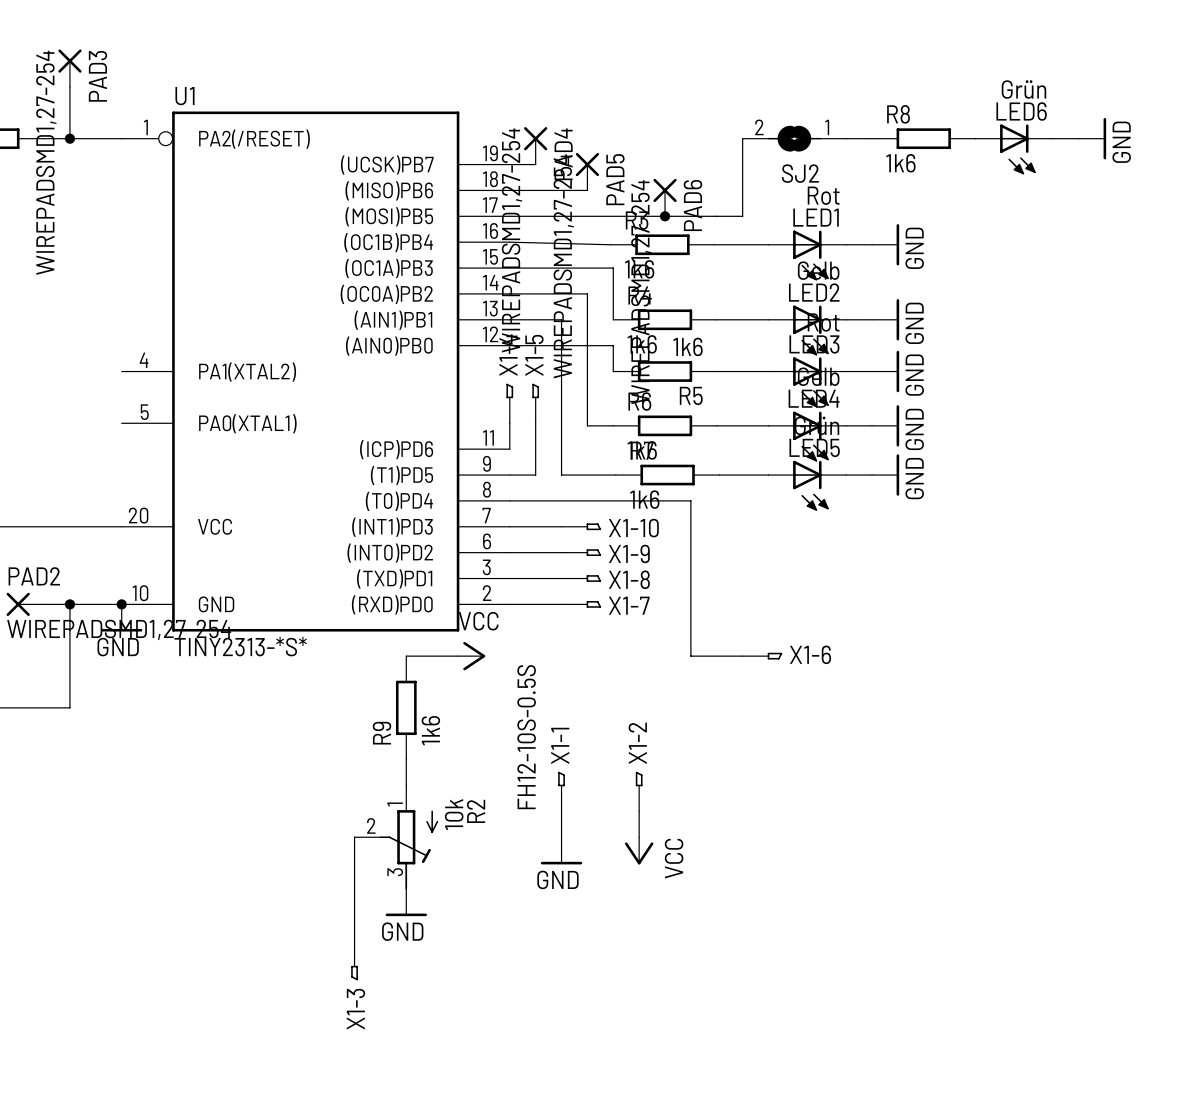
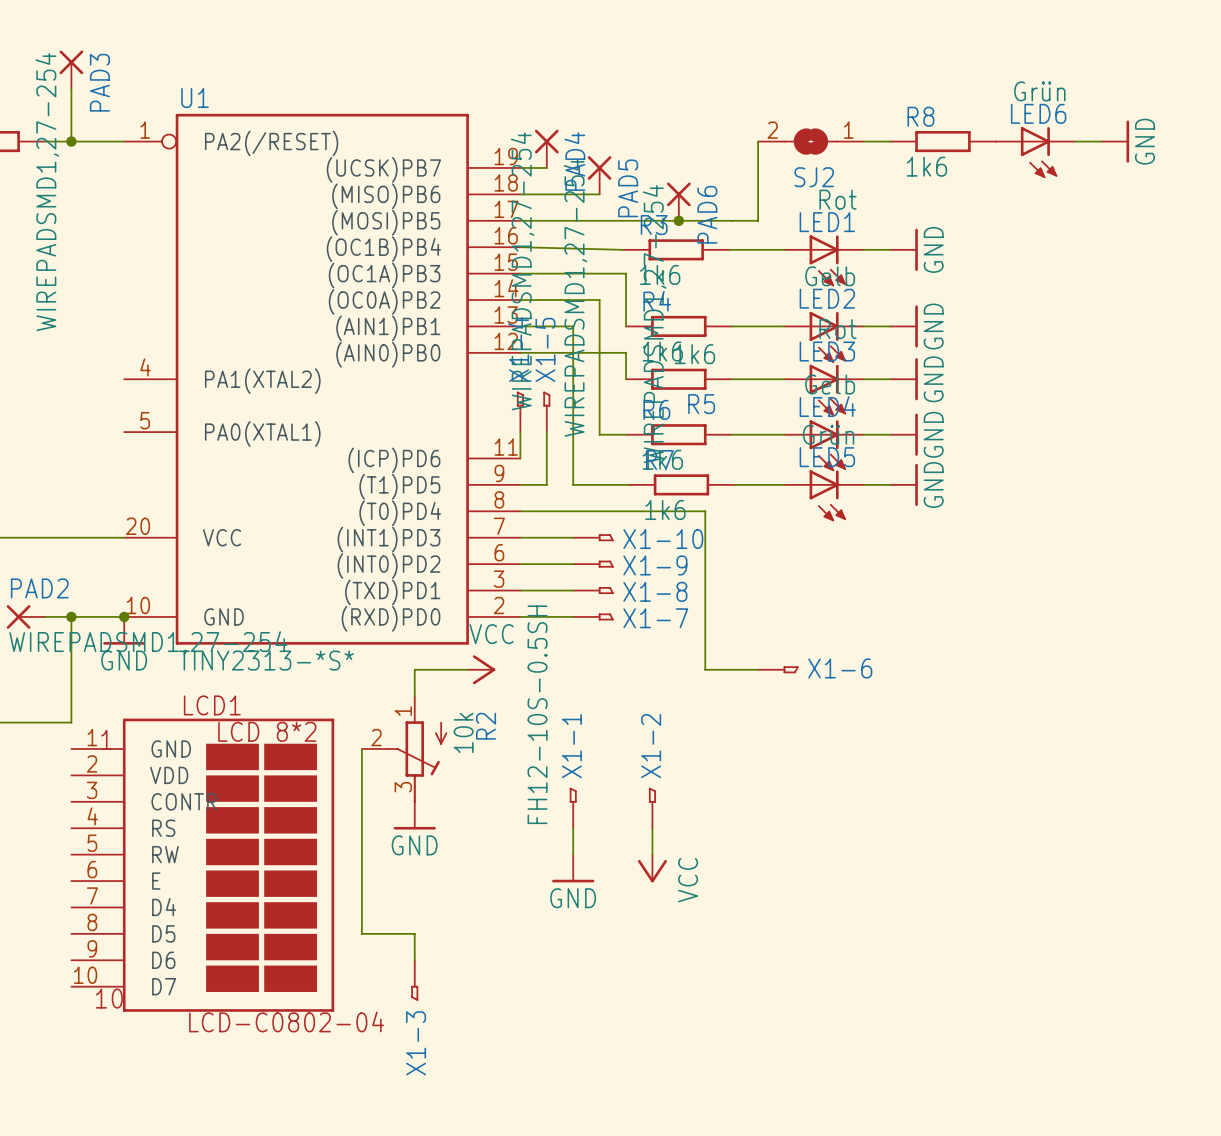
R9: 1k6 (406, 707) -> none
wire: none -> (361, 749) (361, 854)
X1-1 value: FH12-10S-0.5S (526, 737) -> FH12-10S-0.5SH (537, 714)
R2 position: (396, 837) -> (404, 749)
LCD1: none -> LCD-C0802-04 (202, 865)
power symbol position: GND (406, 902) -> GND (414, 815)
wire: (354, 914) (354, 940) -> (361, 933) (414, 933) (414, 960)
X1-3 position: (354, 960) -> (414, 980)

